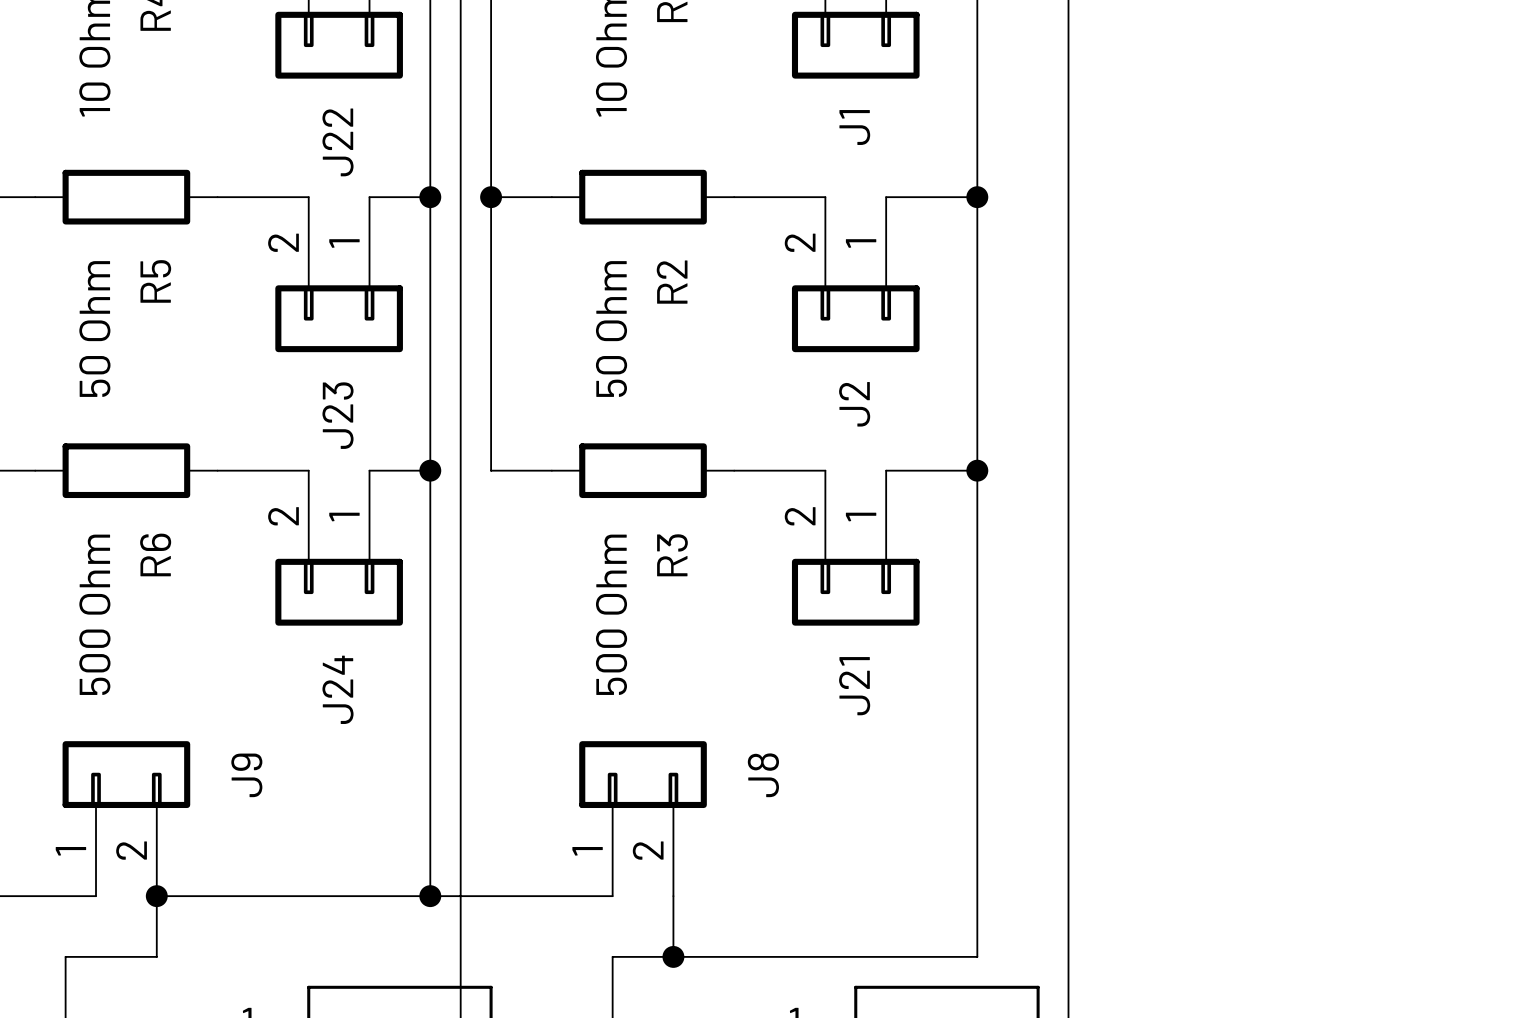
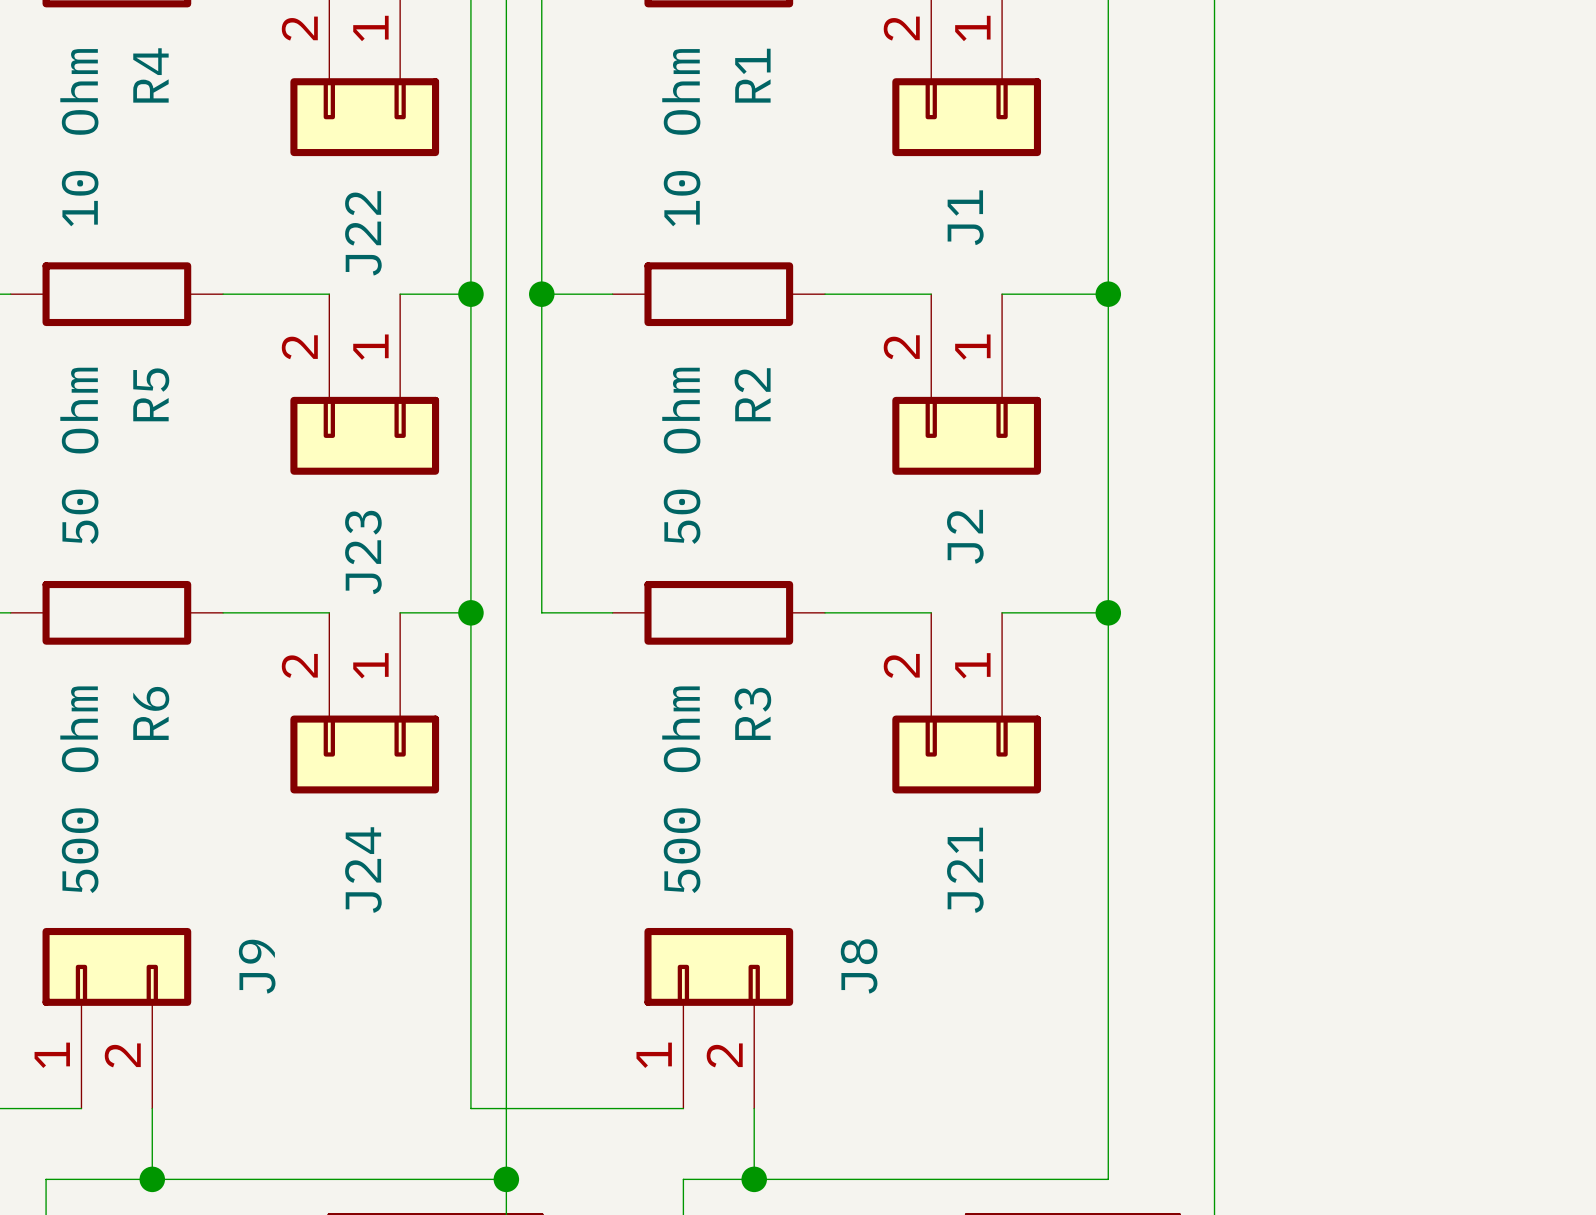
wire: (156, 896) (430, 896) -> none
junction position: (156, 896) -> (152, 1179)
junction position: (430, 896) -> (506, 1179)
wire: none -> (152, 1179) (506, 1179)

